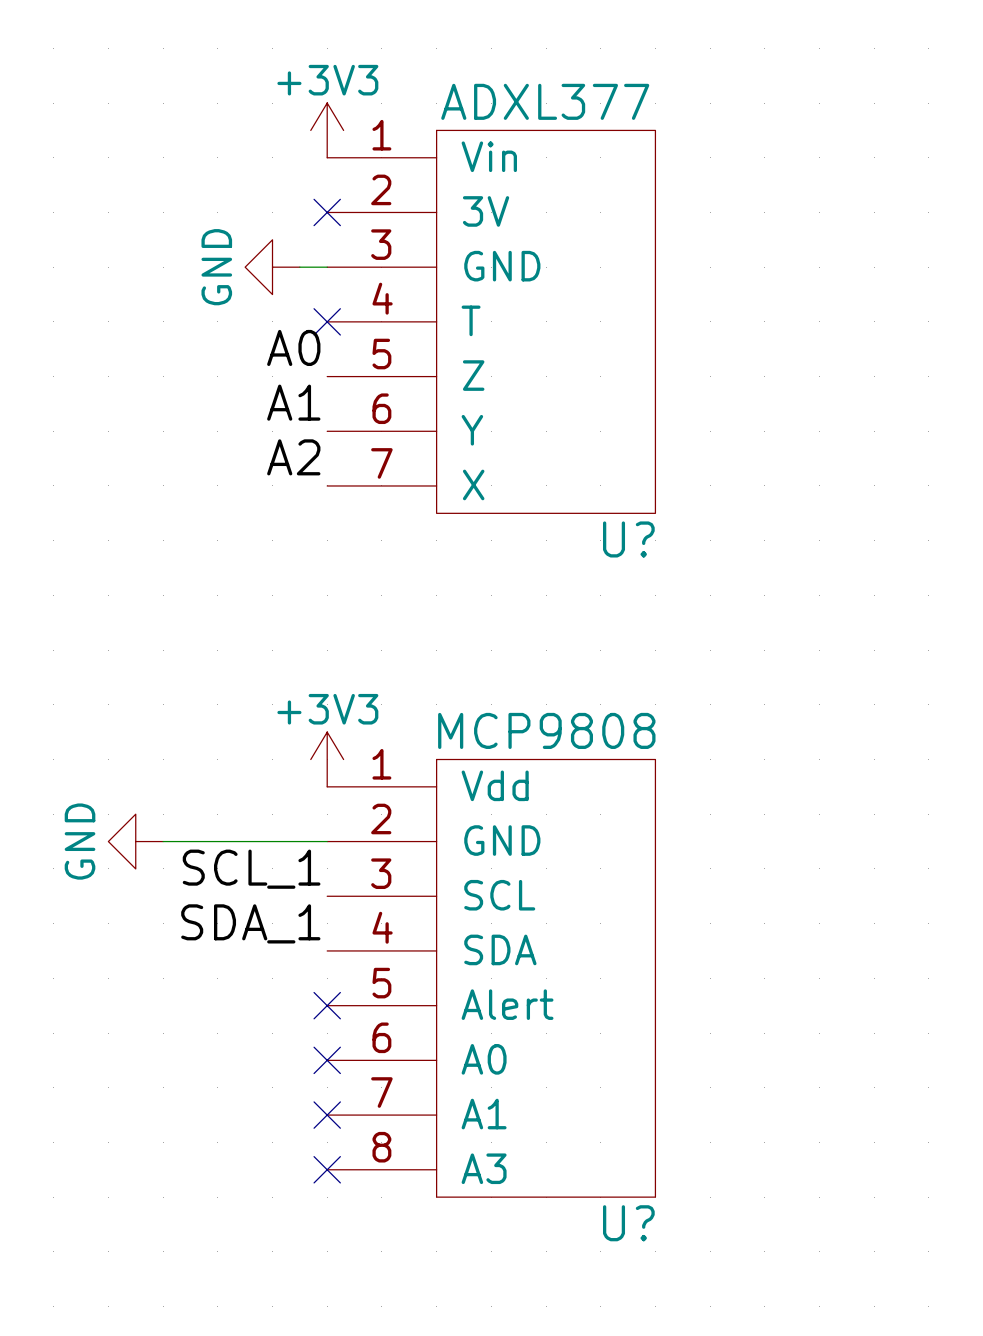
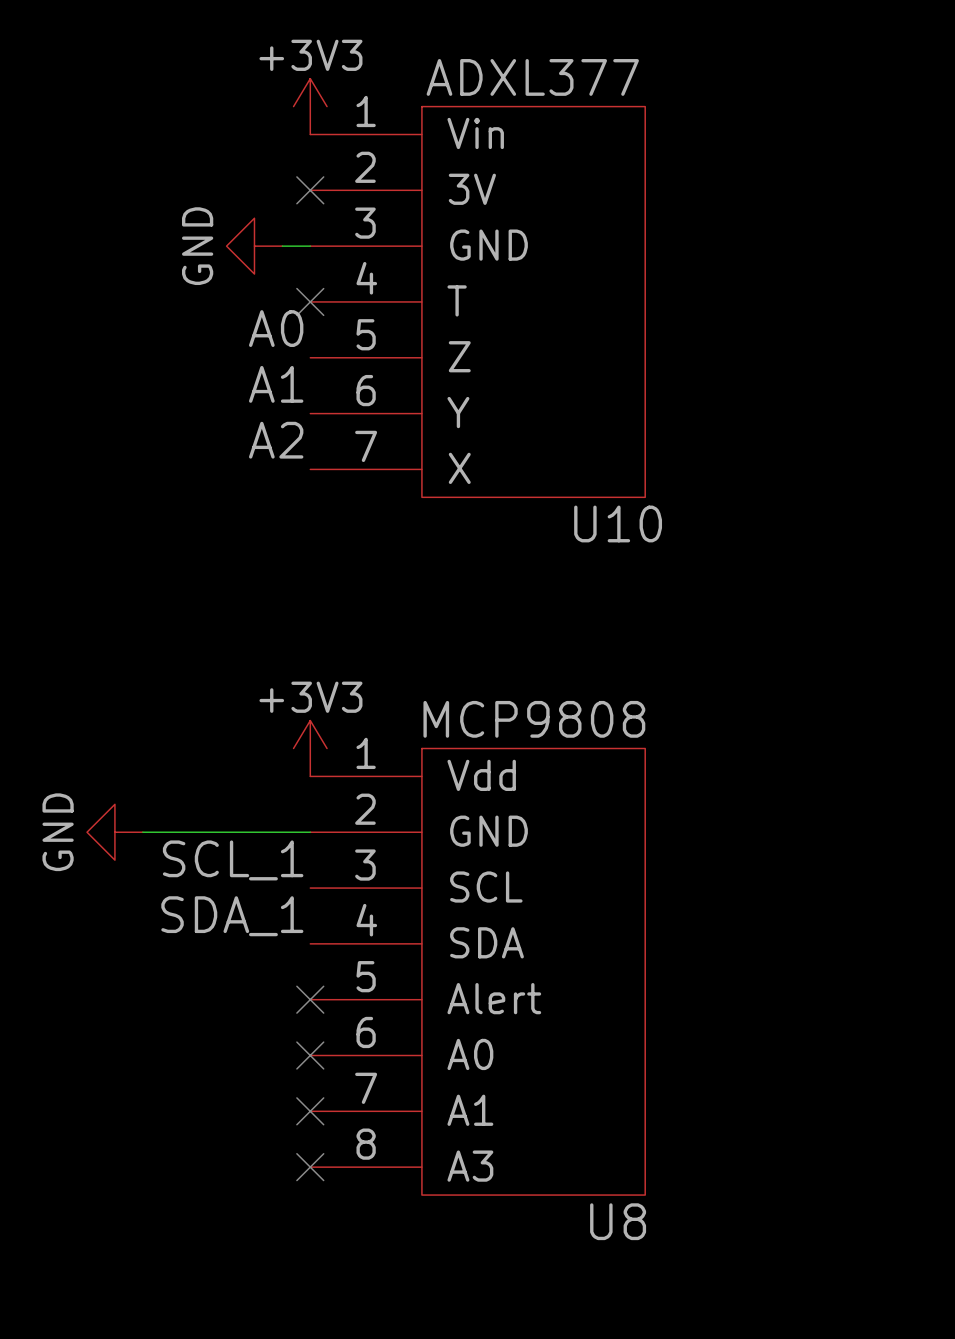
U? name: U? (628, 539) -> U10 (618, 523)
U? name: U? (628, 1223) -> U8 (618, 1221)

